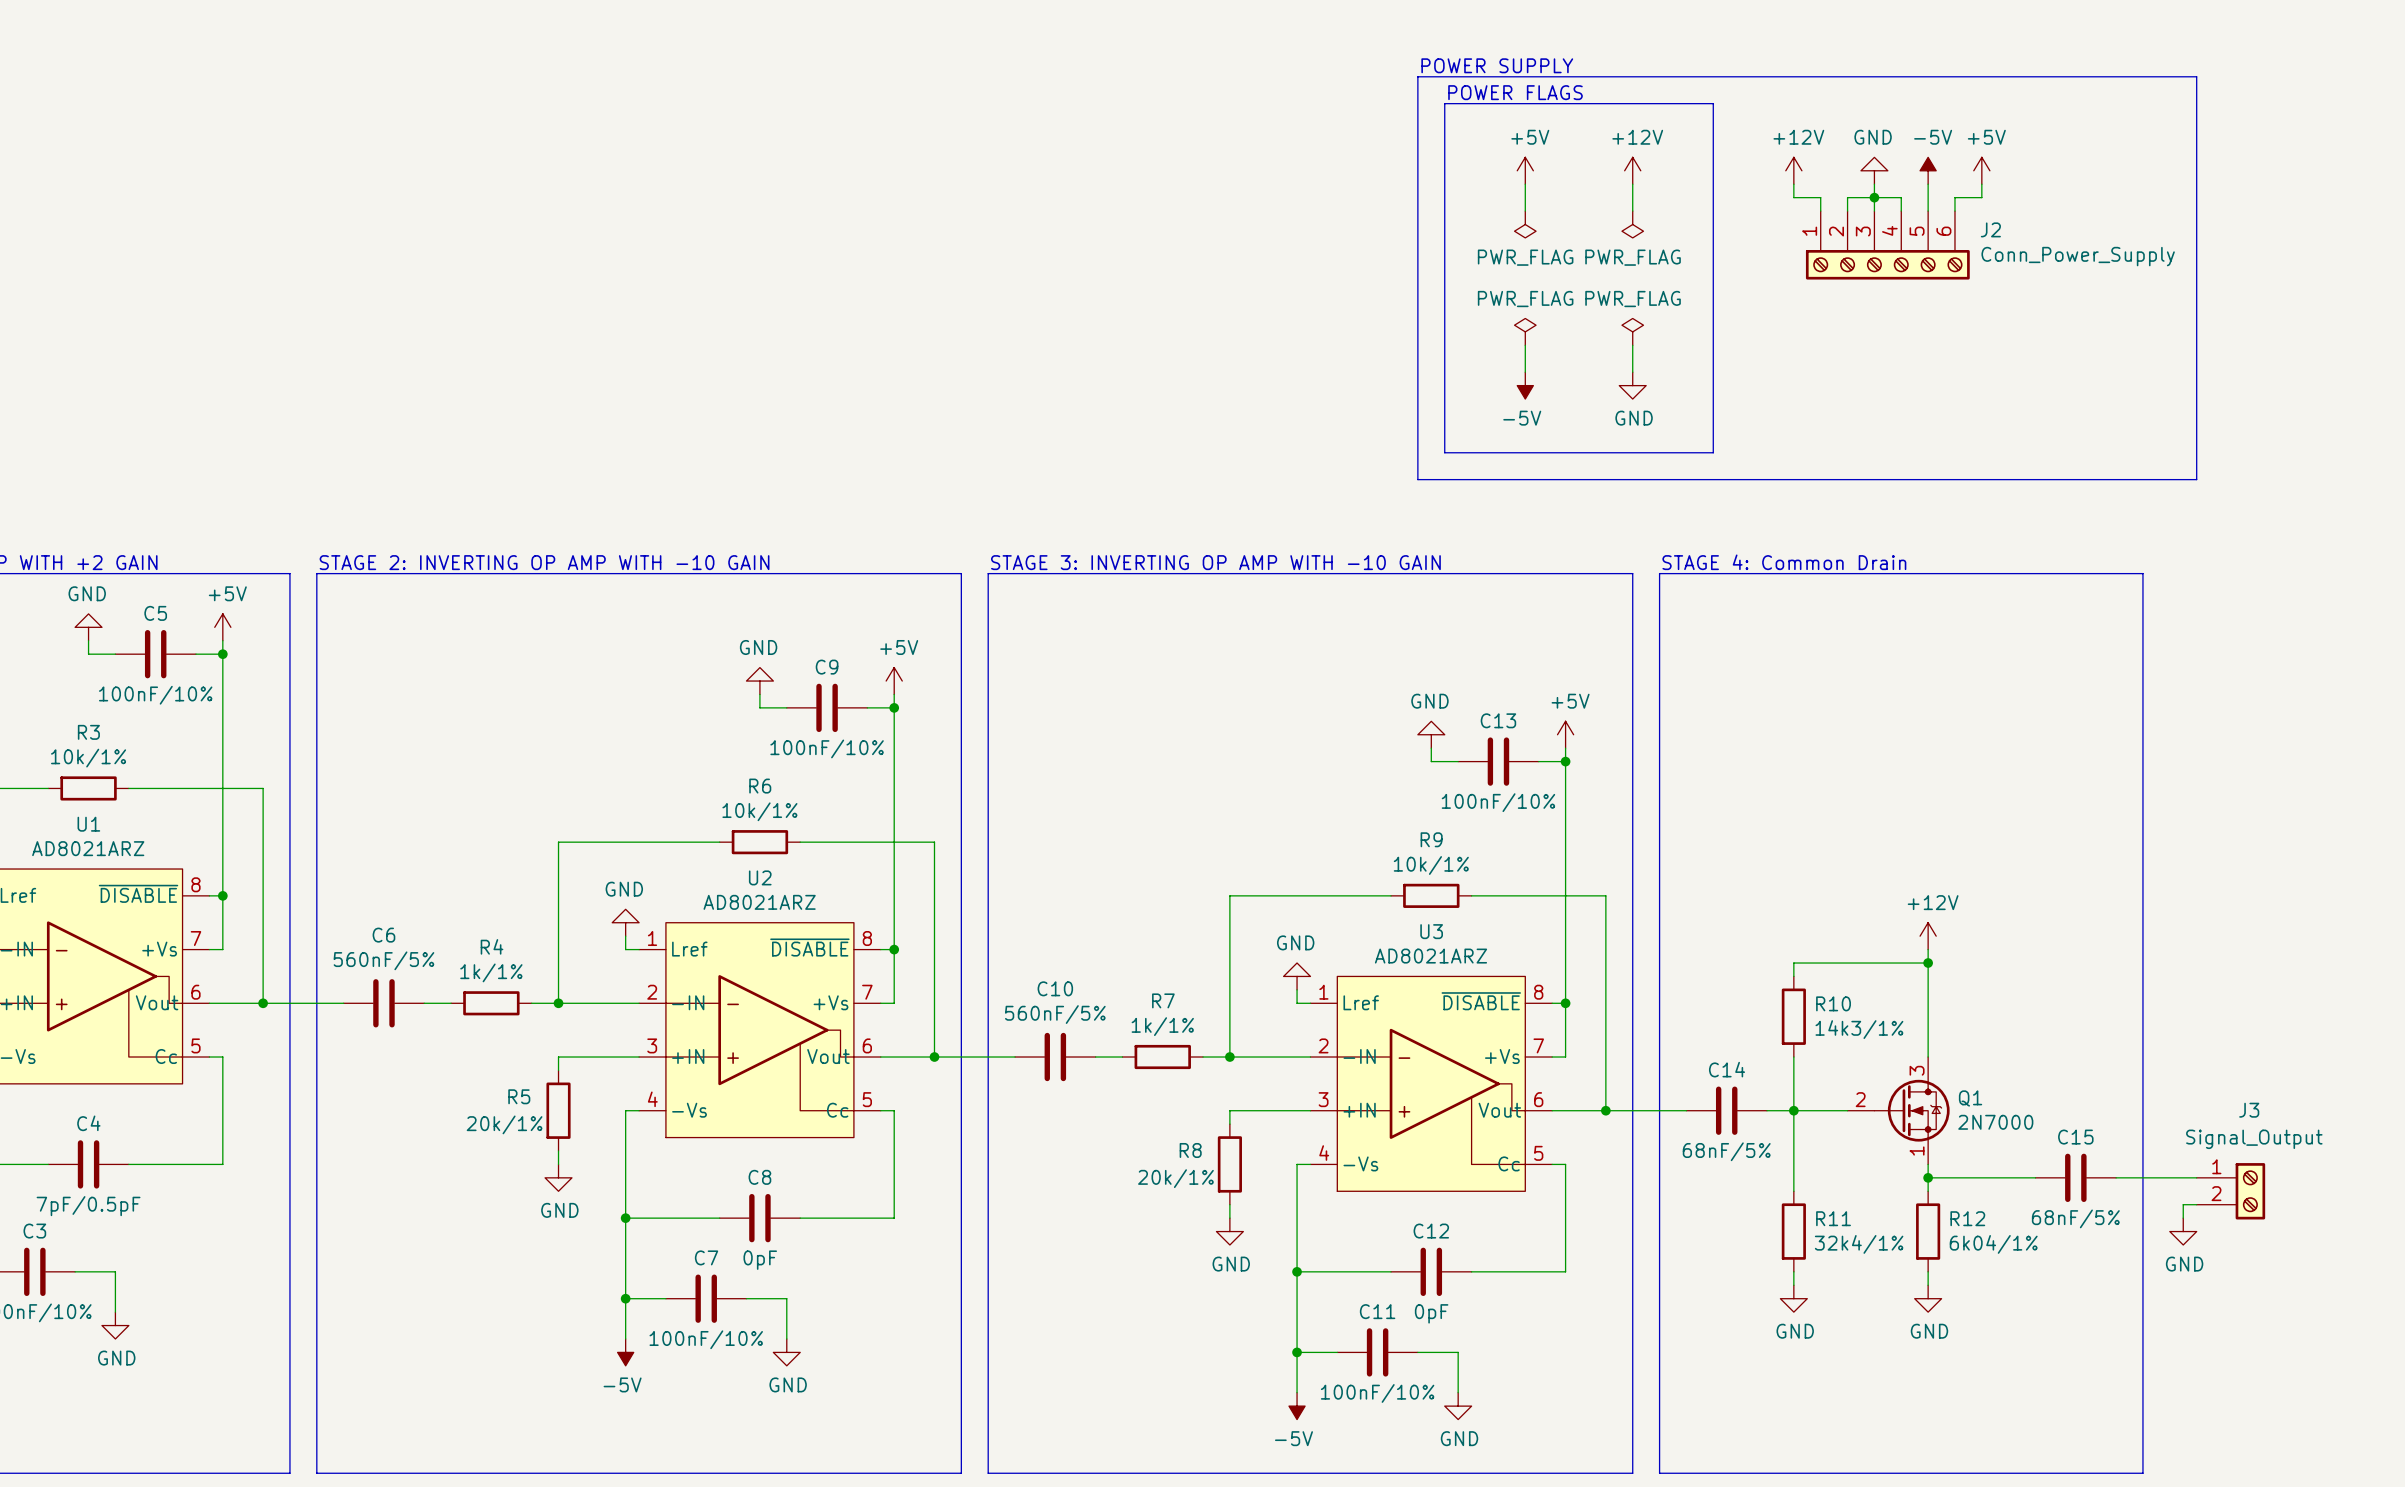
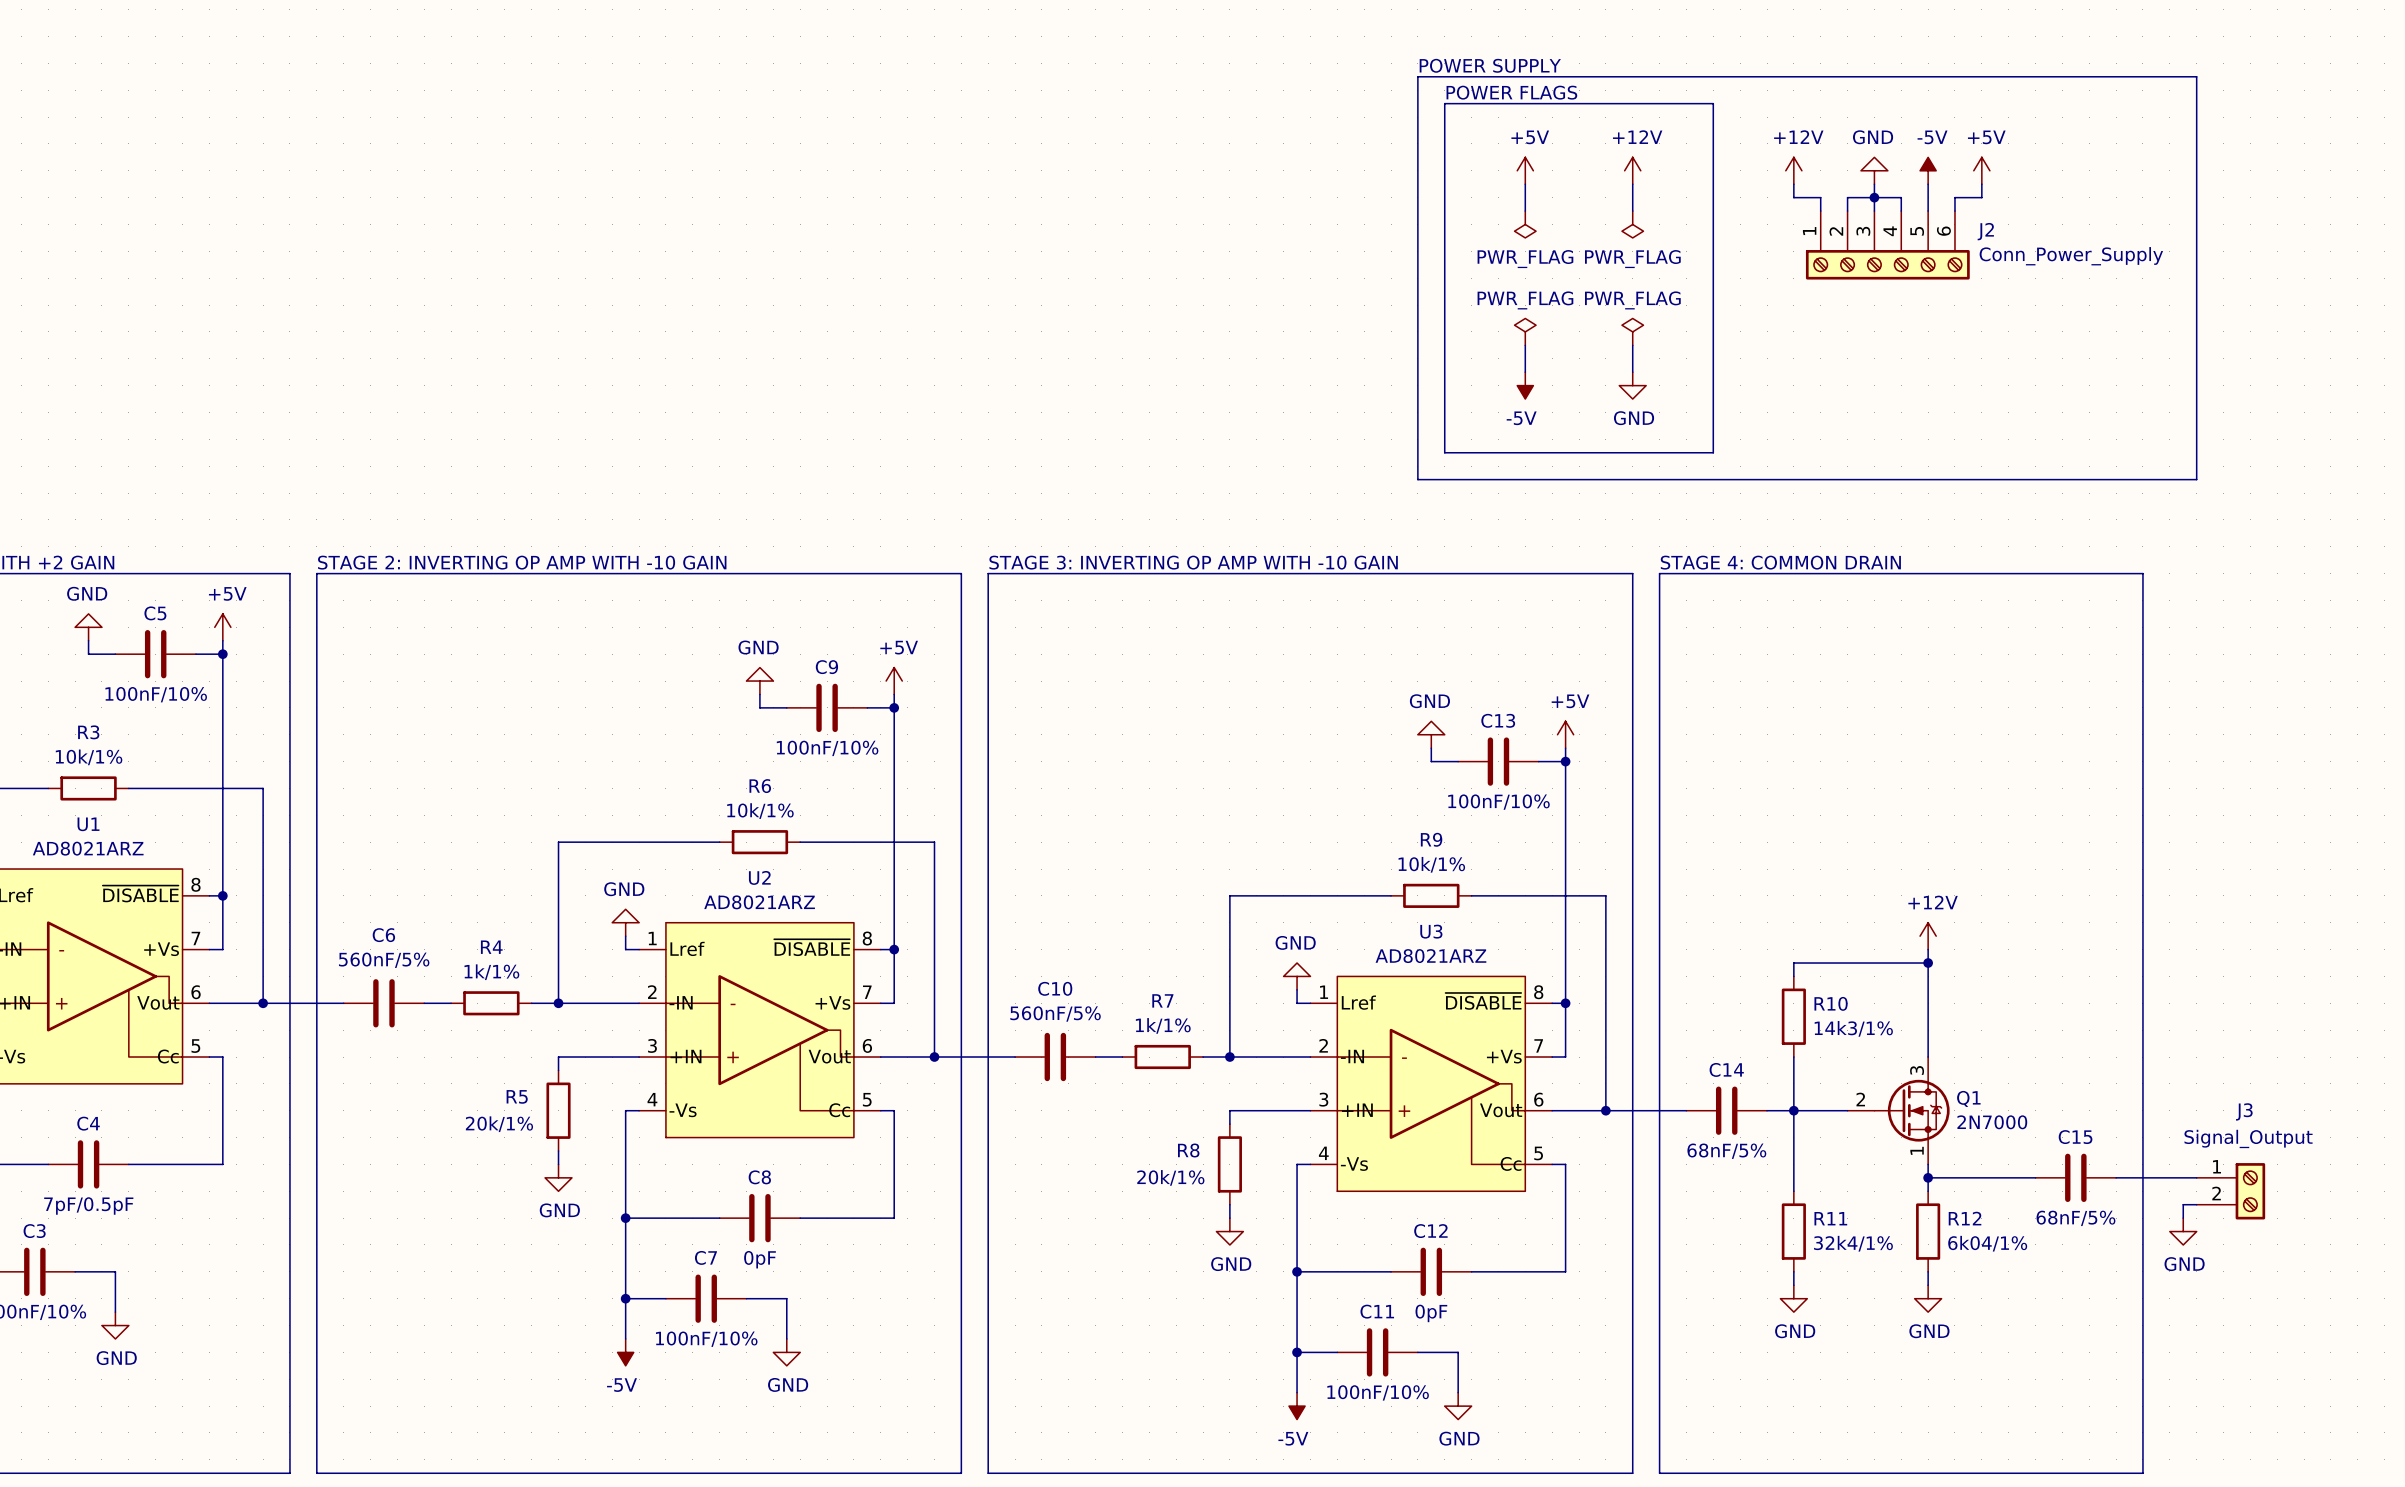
text: STAGE 4: Common Drain (1784, 562) -> STAGE 4: COMMON DRAIN (1780, 562)

